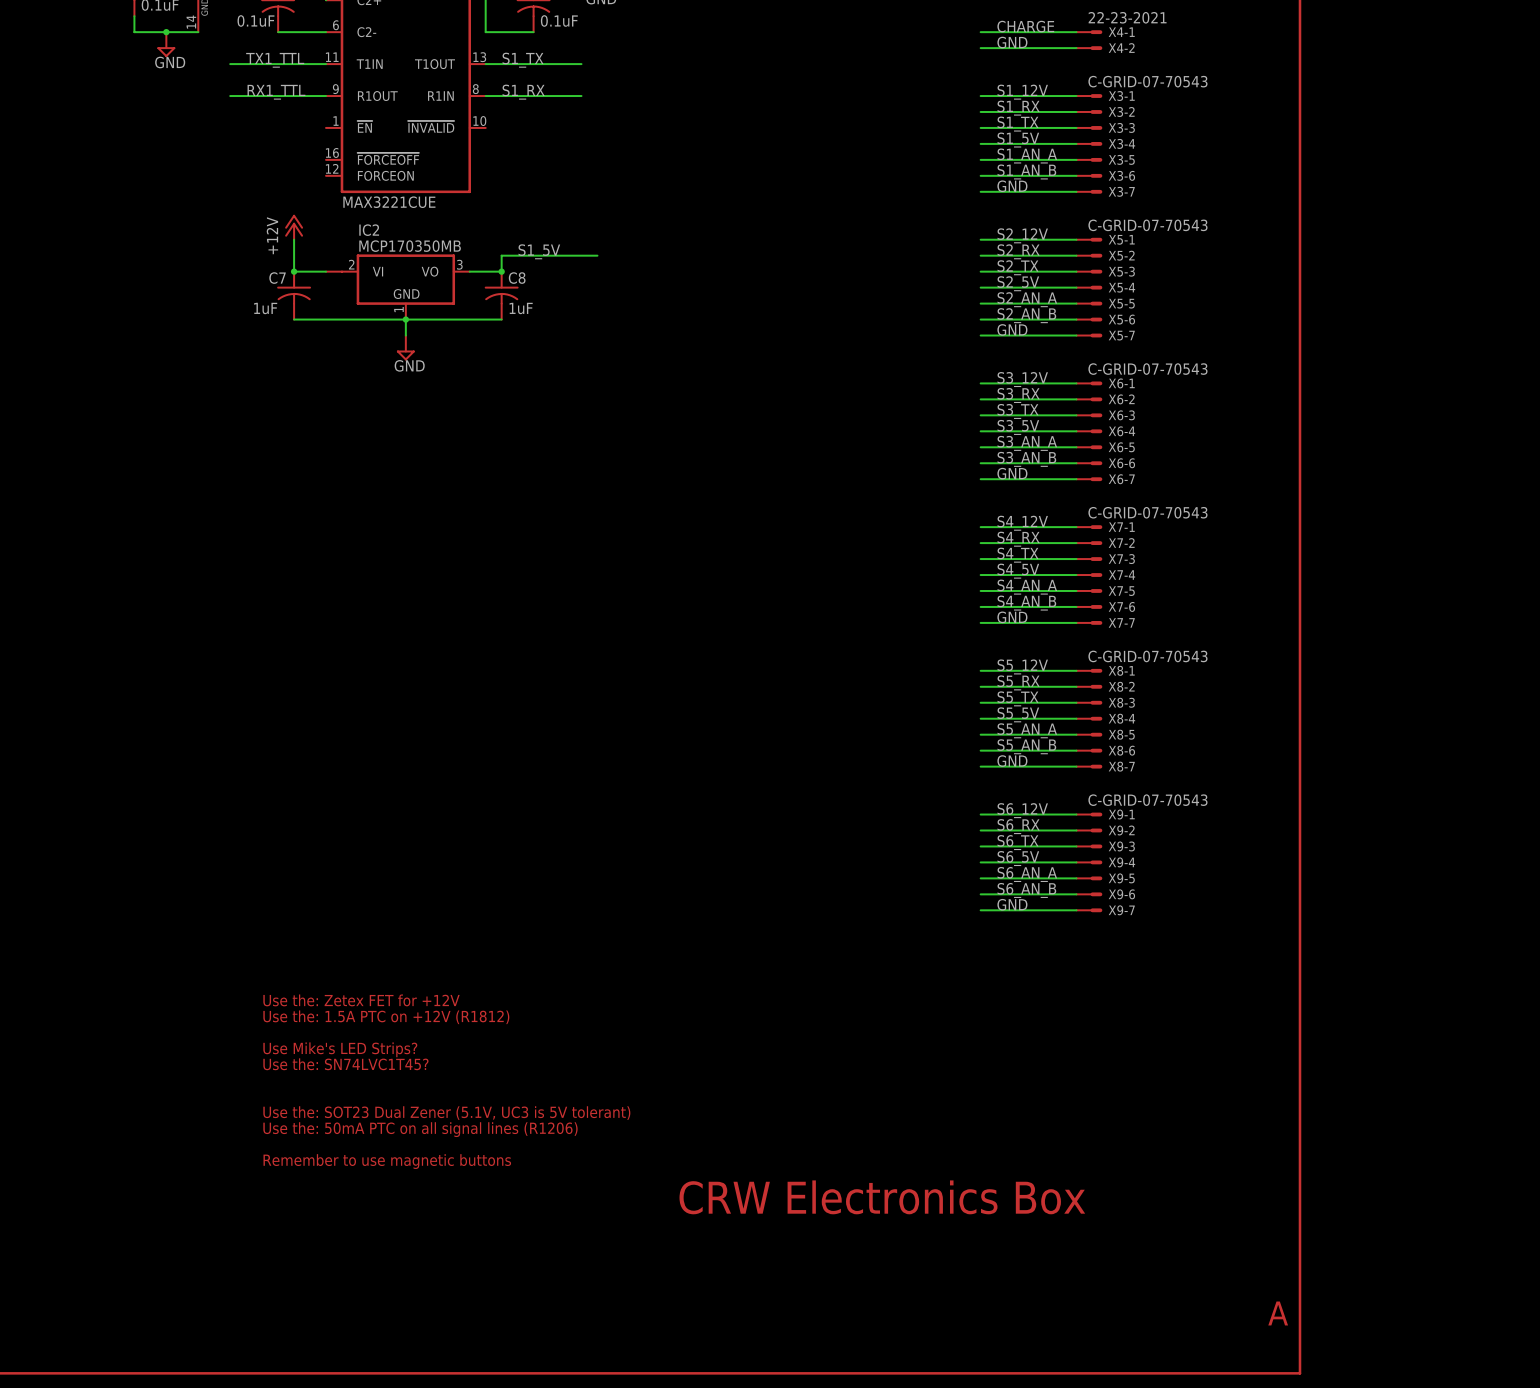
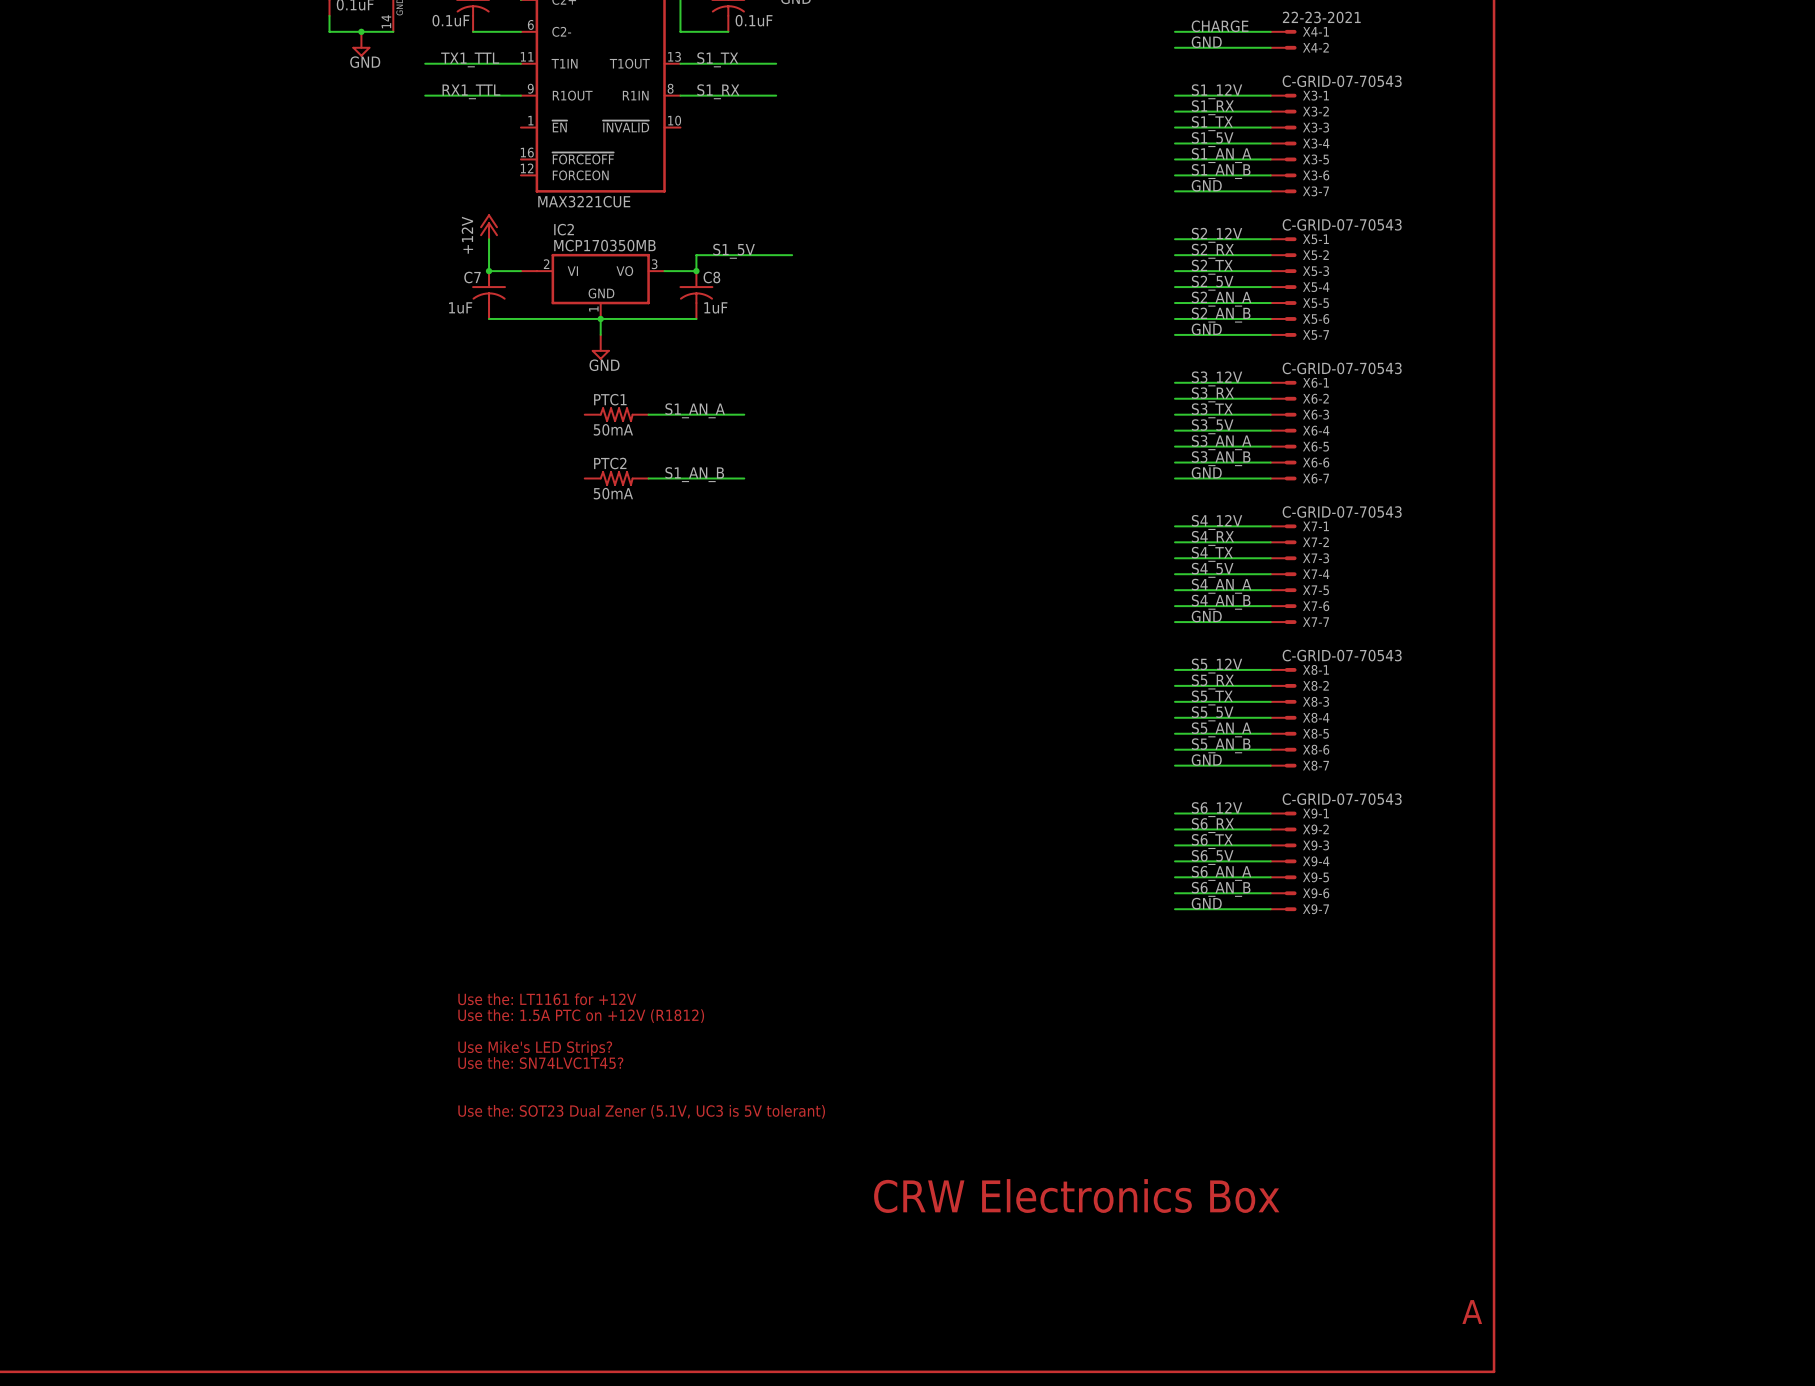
label: none -> S1_AN_A (695, 410)
PTC1: none -> 50mA (616, 414)
wire: none -> (648, 414) (744, 414)
label: none -> S1_AN_B (694, 474)
PTC2: none -> 50mA (616, 478)
wire: none -> (648, 478) (744, 478)
text: Use the: Zetex FET for +12V (361, 1000) -> Use the: LT1161 for +12V (547, 999)
text: Use the: 50mA PTC on all signal lines (R1206) (420, 1129) -> none
text: Remember to use magnetic buttons (387, 1161) -> none

